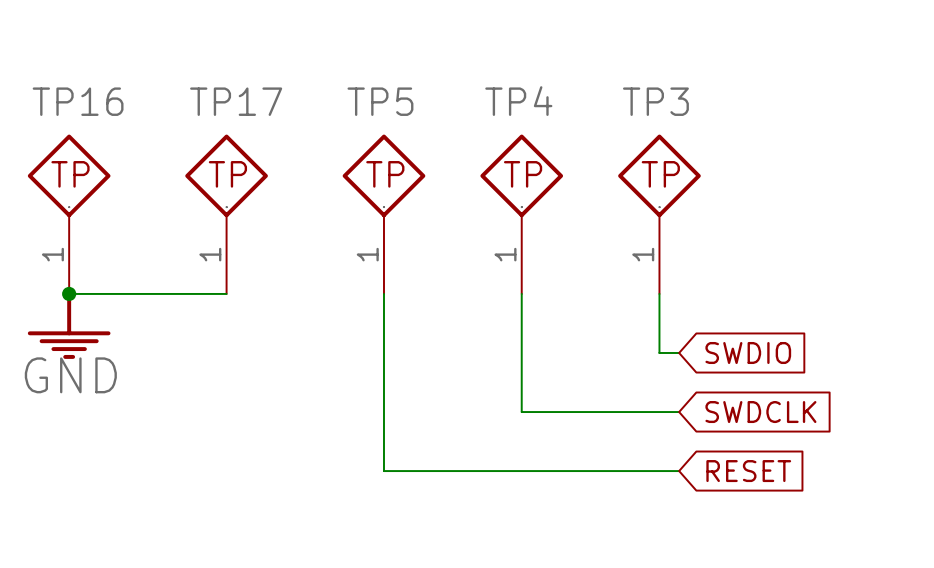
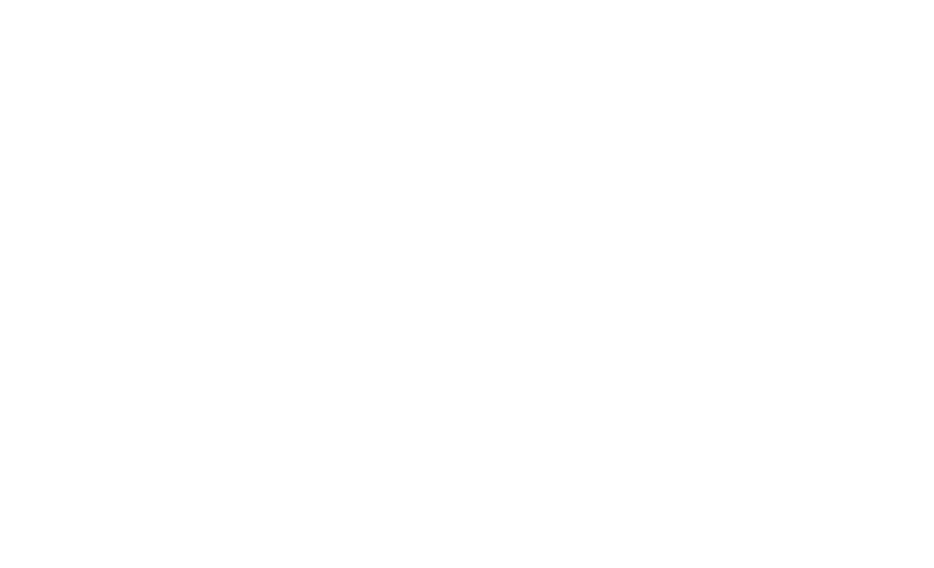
TP16: (69, 214) -> none
TP17: (226, 214) -> none
TP5: (383, 214) -> none
TP4: (521, 214) -> none
TP3: (659, 214) -> none
wire: (69, 293) (226, 293) -> none
junction: (69, 293) -> none
wire: (383, 293) (383, 471) (679, 471) -> none
wire: (521, 293) (521, 412) (679, 412) -> none
wire: (659, 293) (659, 352) (679, 352) -> none
power symbol: GND (69, 325) -> none
global label: SWDIO (748, 352) -> none
global label: SWDCLK (760, 412) -> none
global label: RESET (748, 471) -> none

